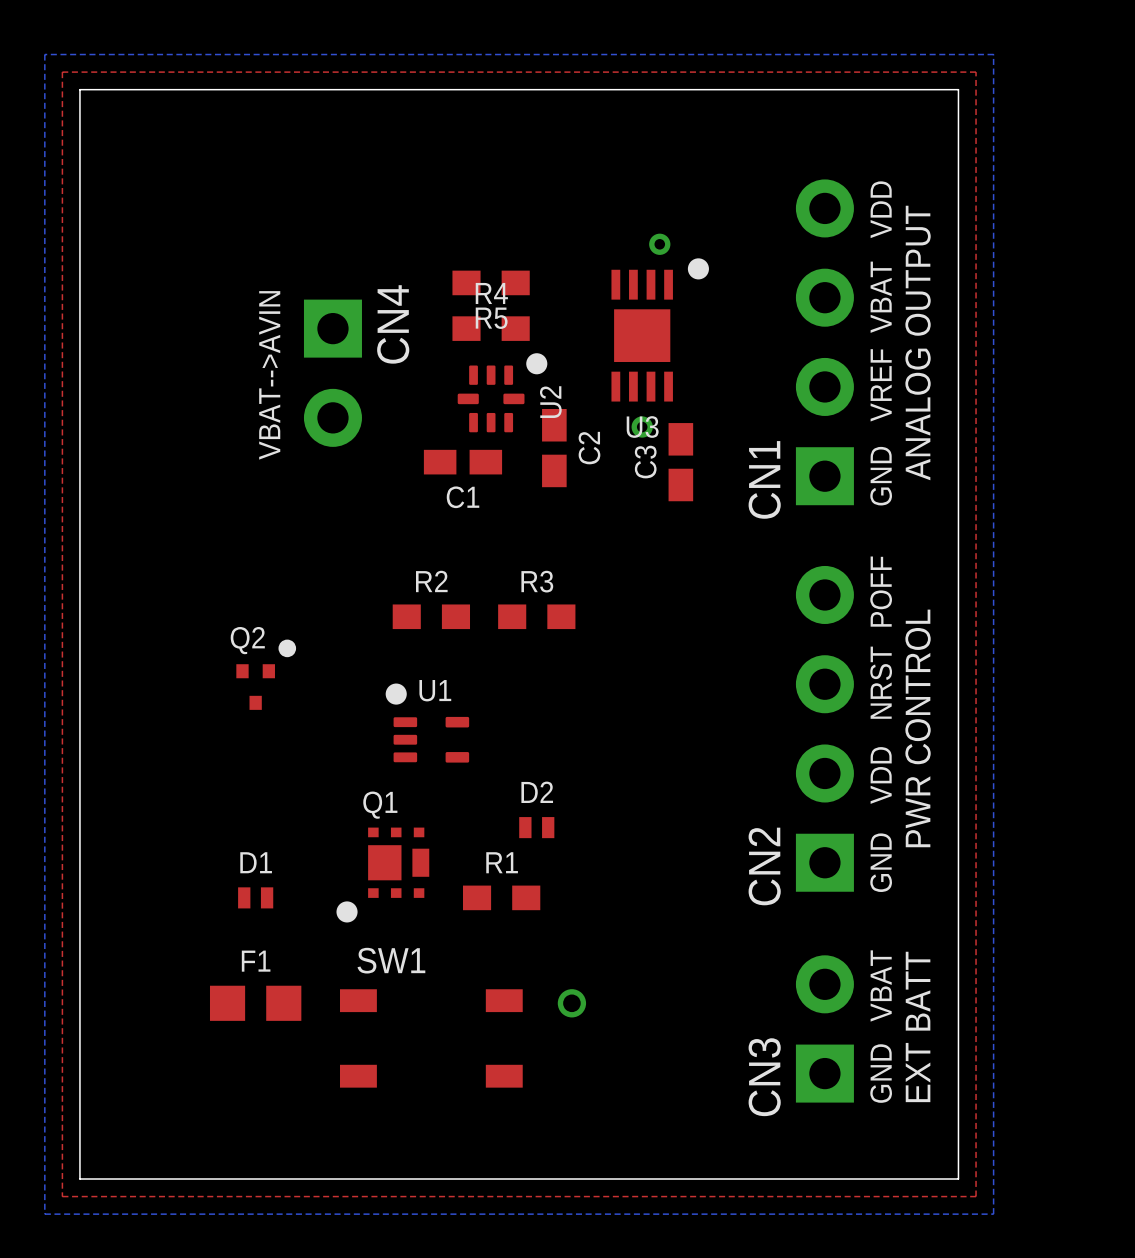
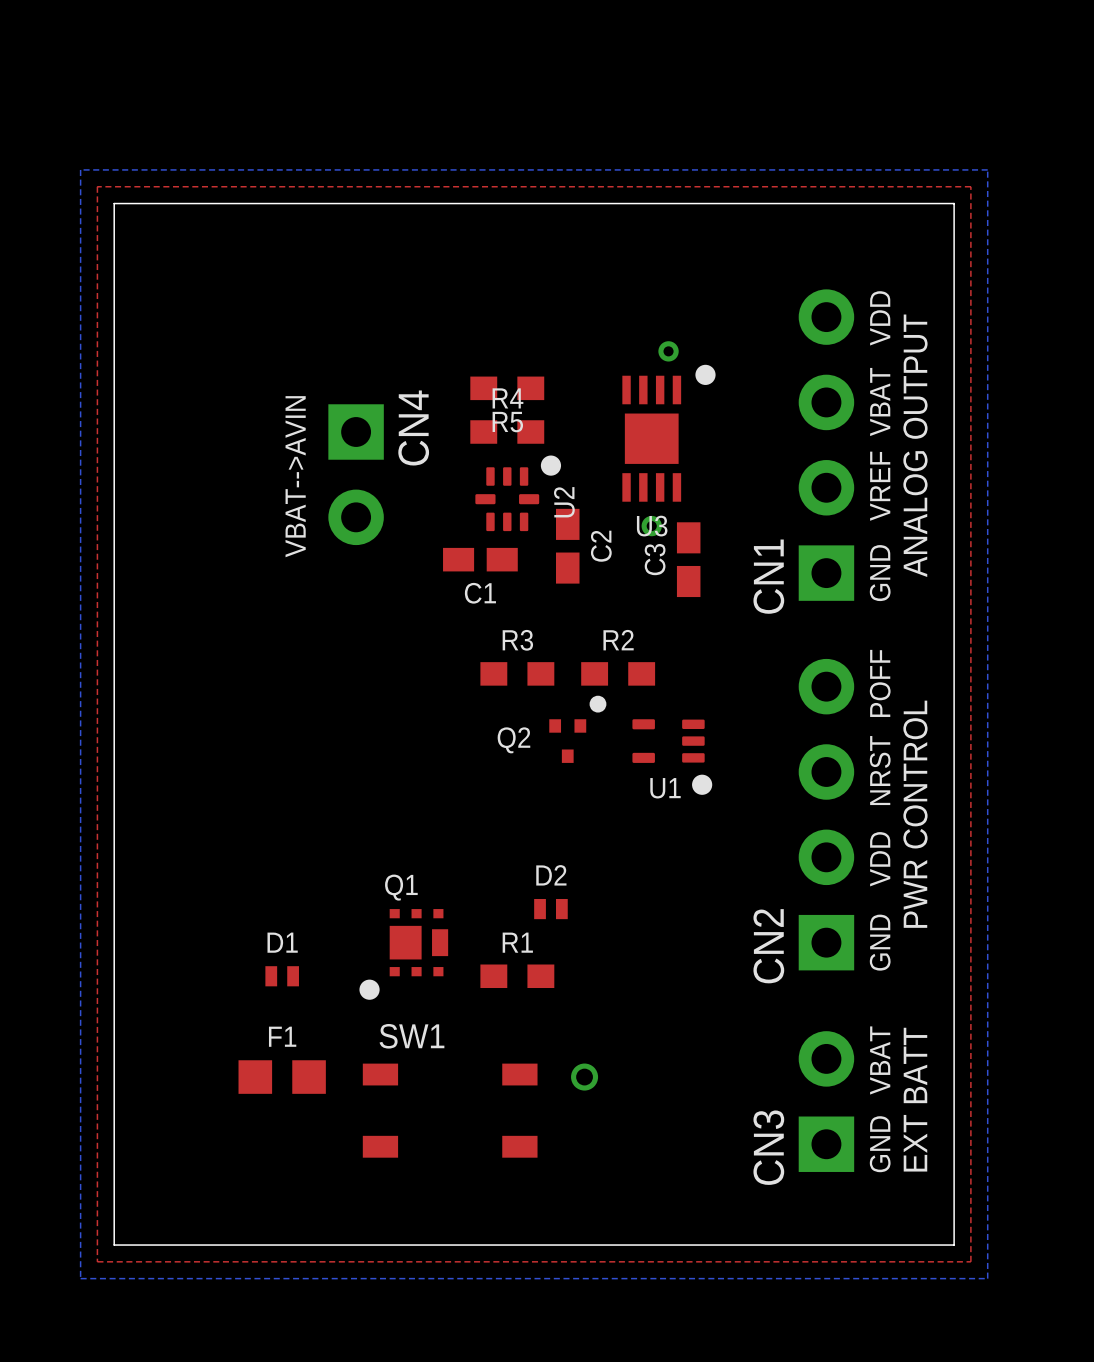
R2 position: (431, 616) -> (618, 673)
R3 position: (536, 616) -> (517, 673)
Q2 name position: Q2 (247, 640) -> Q2 (513, 740)
Q2 position: (266, 674) -> (577, 729)
U1 rotation: 0° (427, 723) -> 180° (672, 757)
U1 position: (427, 723) -> (672, 757)

